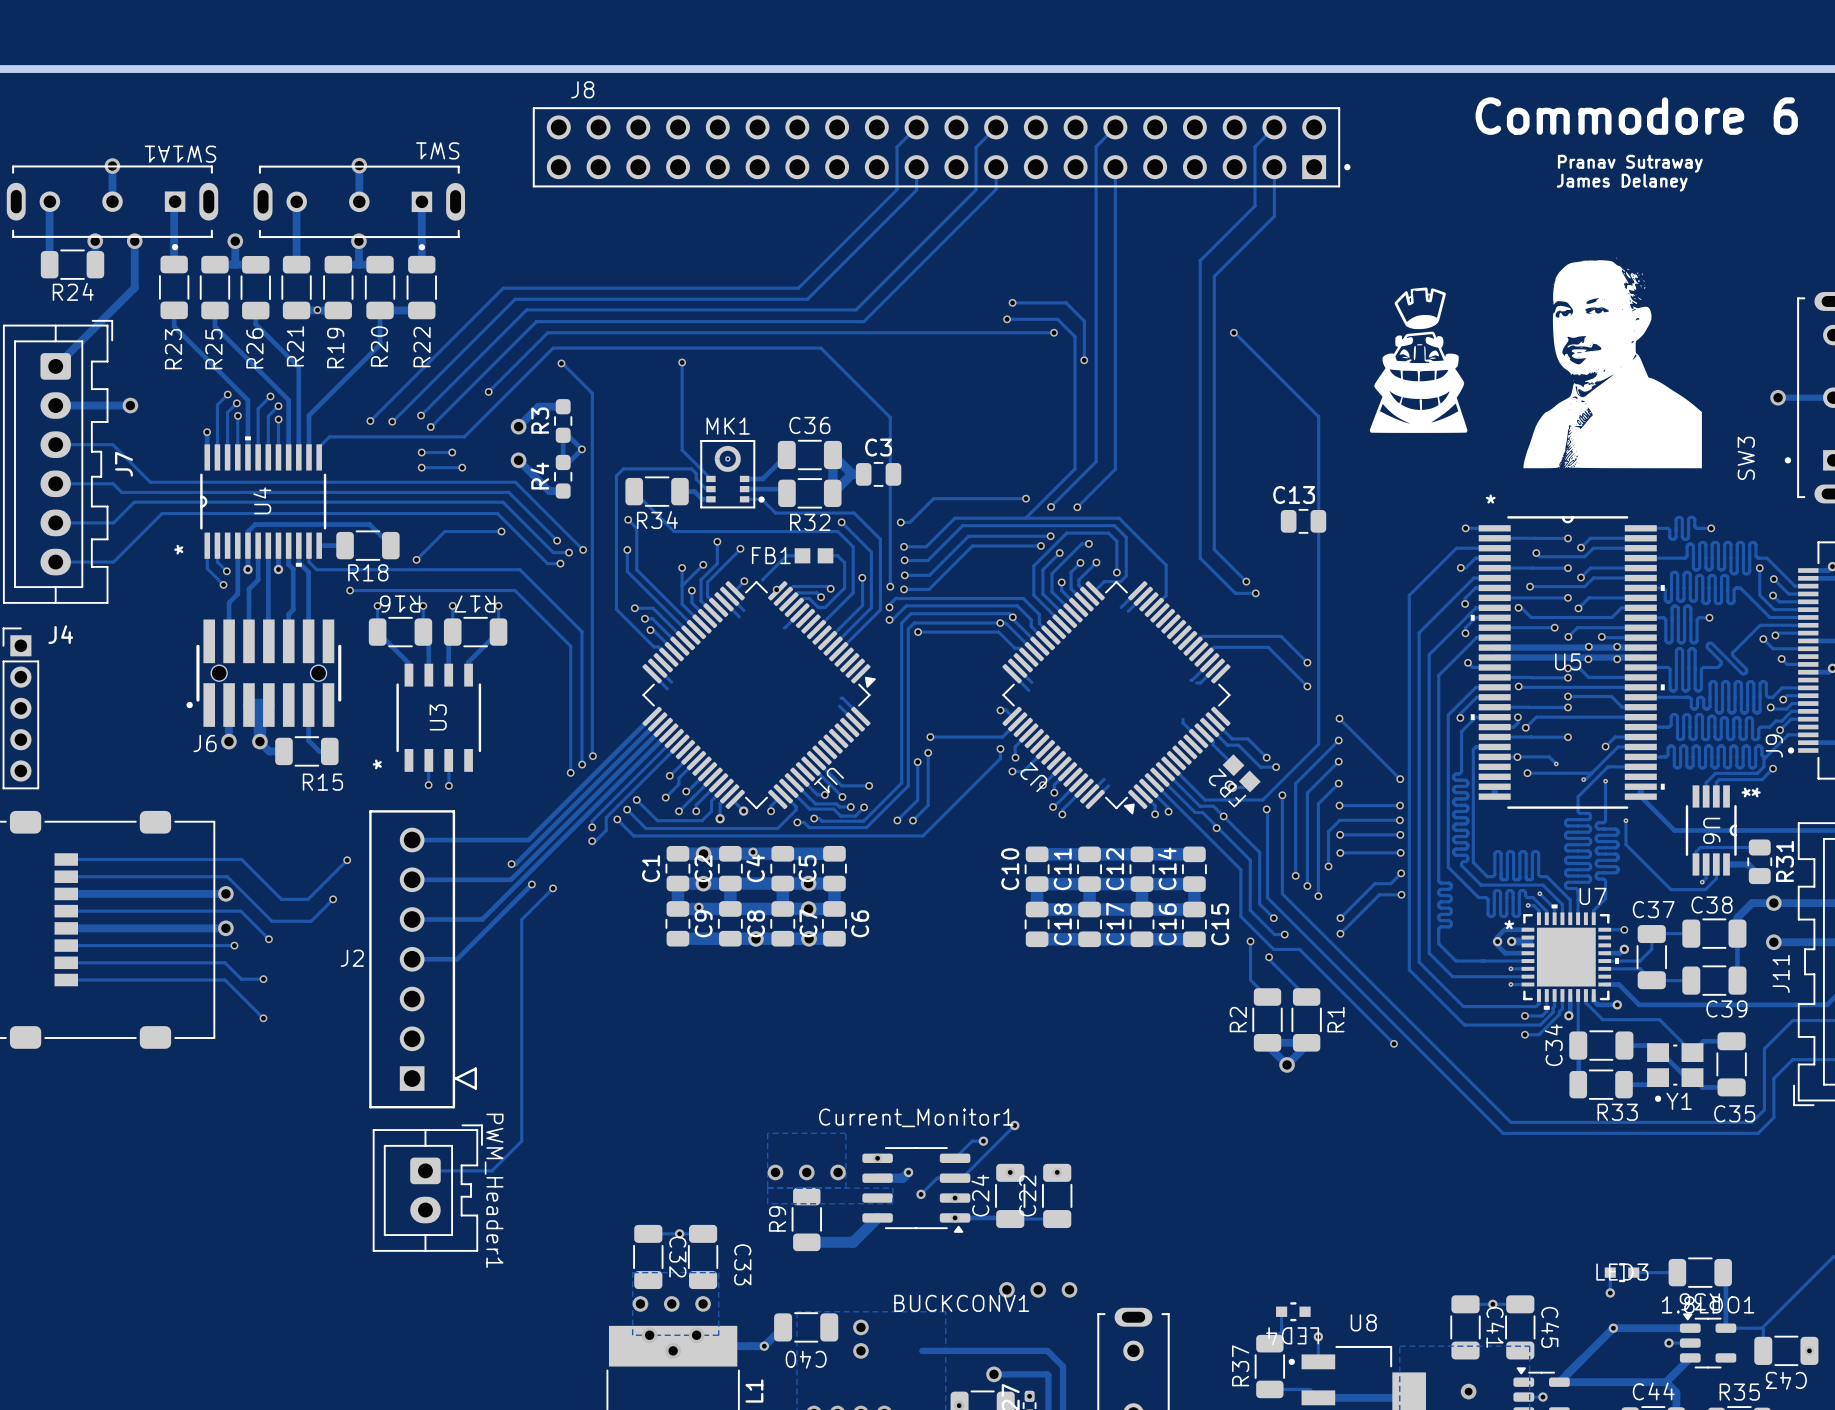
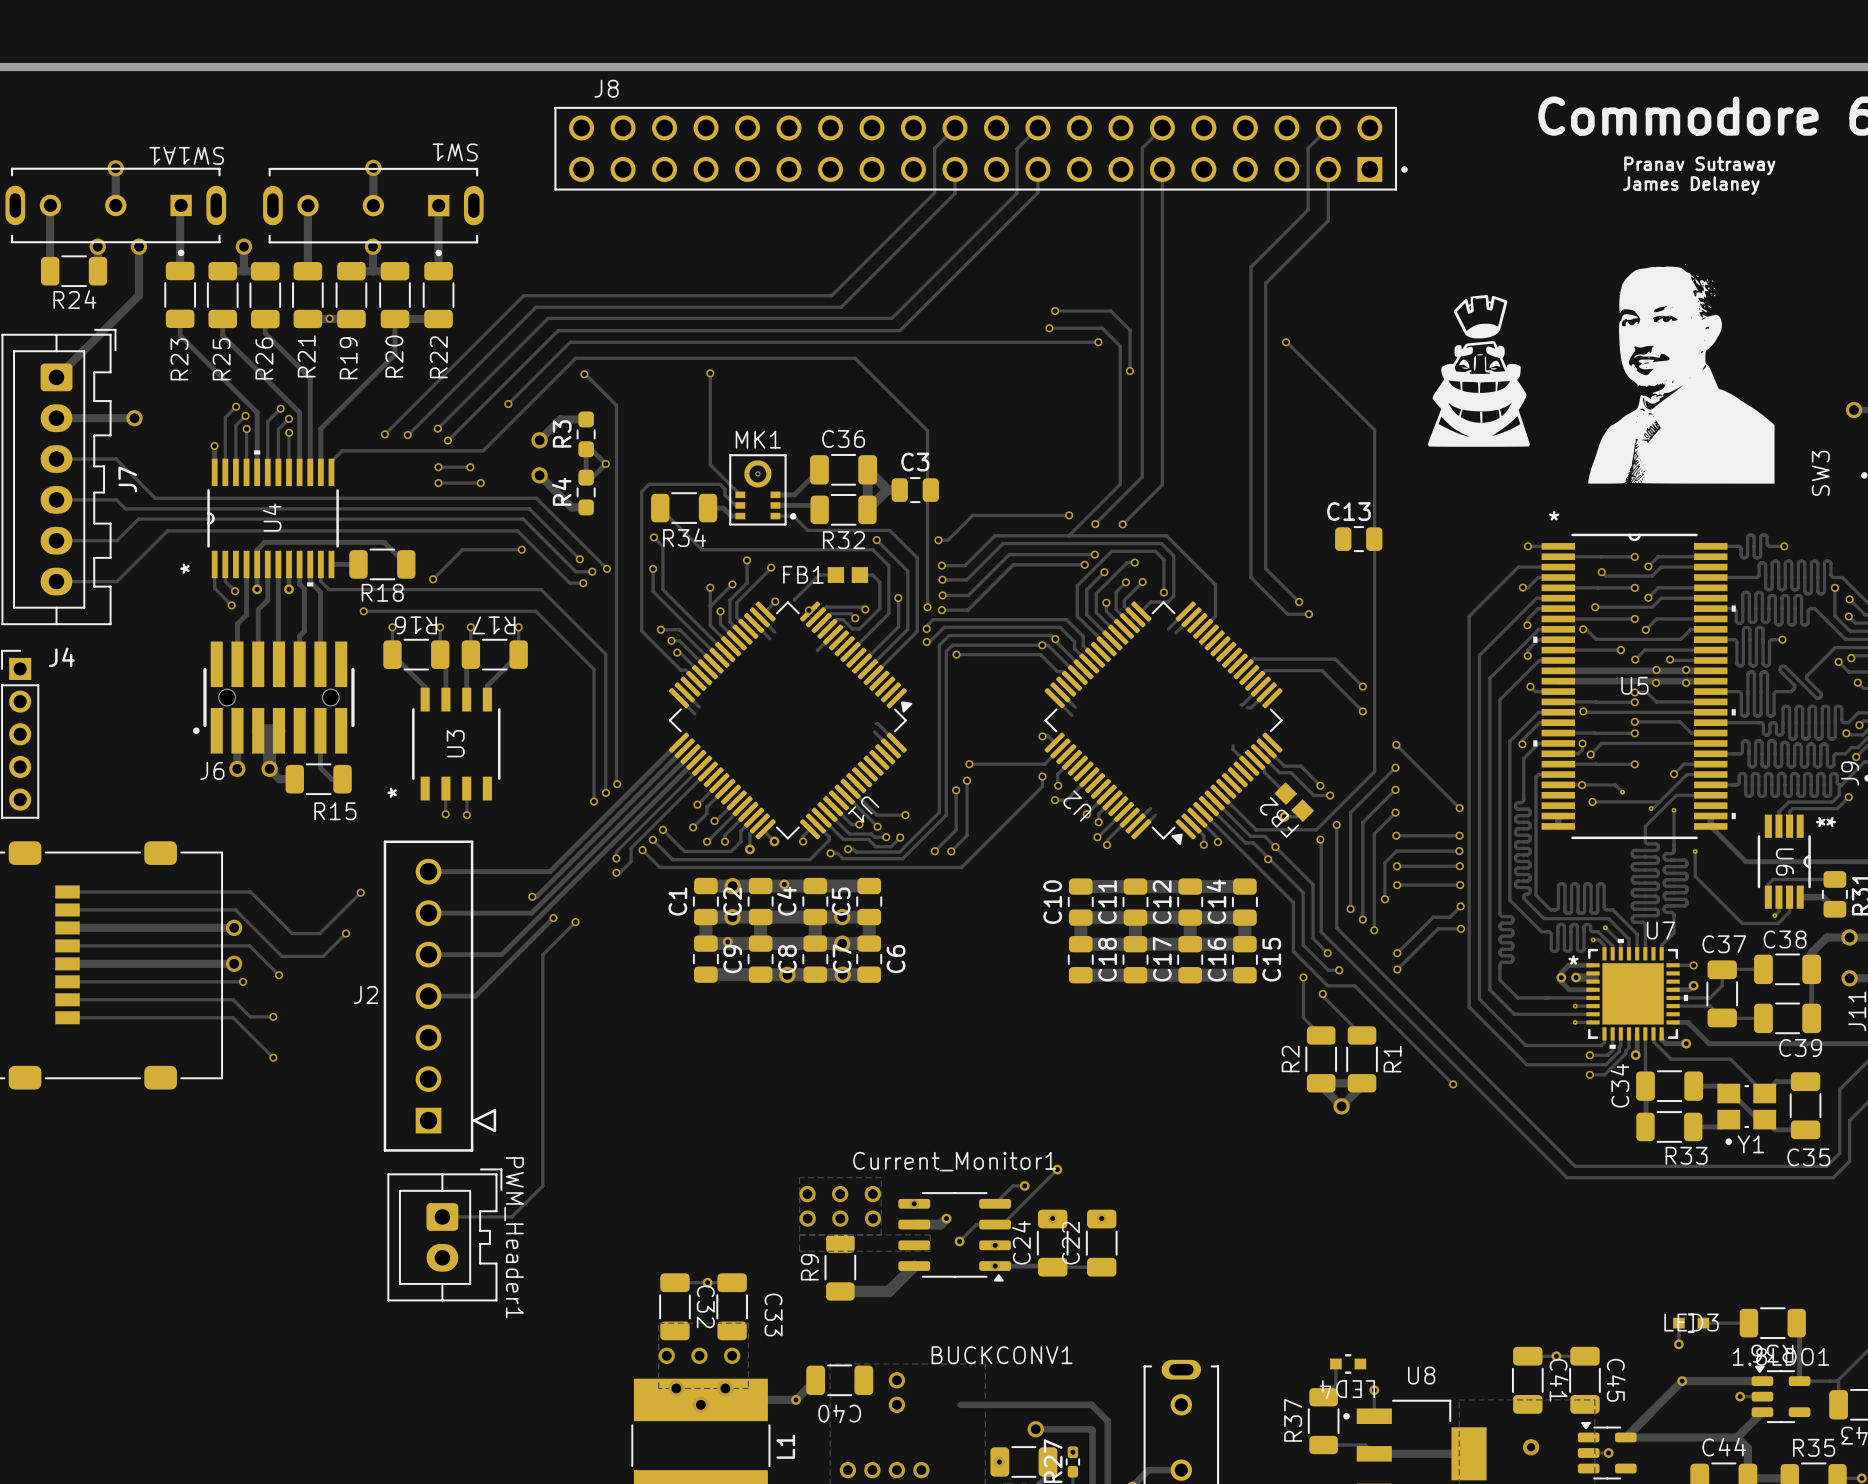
via: none -> (807, 1194)
via: none -> (840, 1194)
via: none -> (872, 1194)
via: (1006, 1289) -> none
via: (1038, 1289) -> none
via: (1069, 1289) -> none

